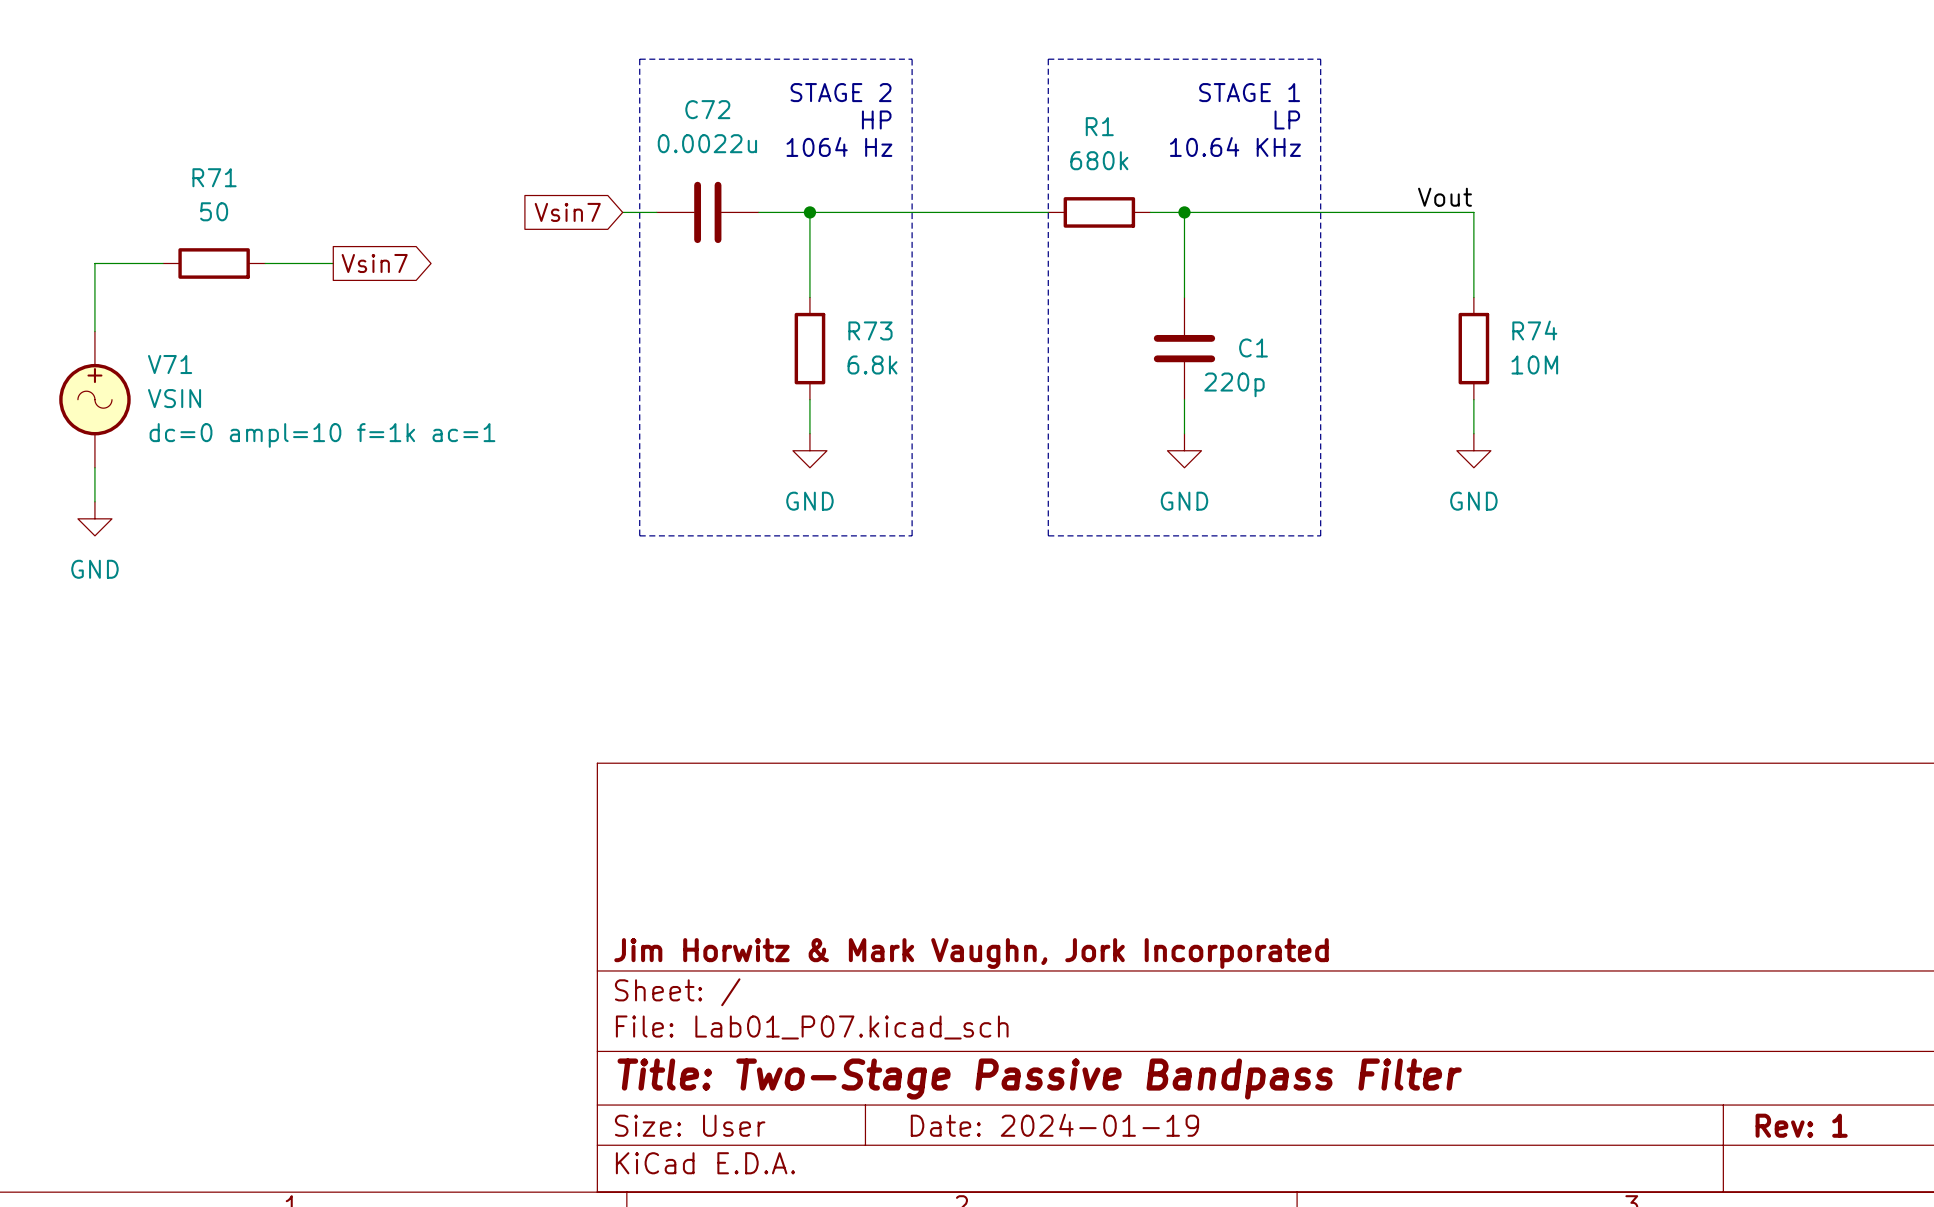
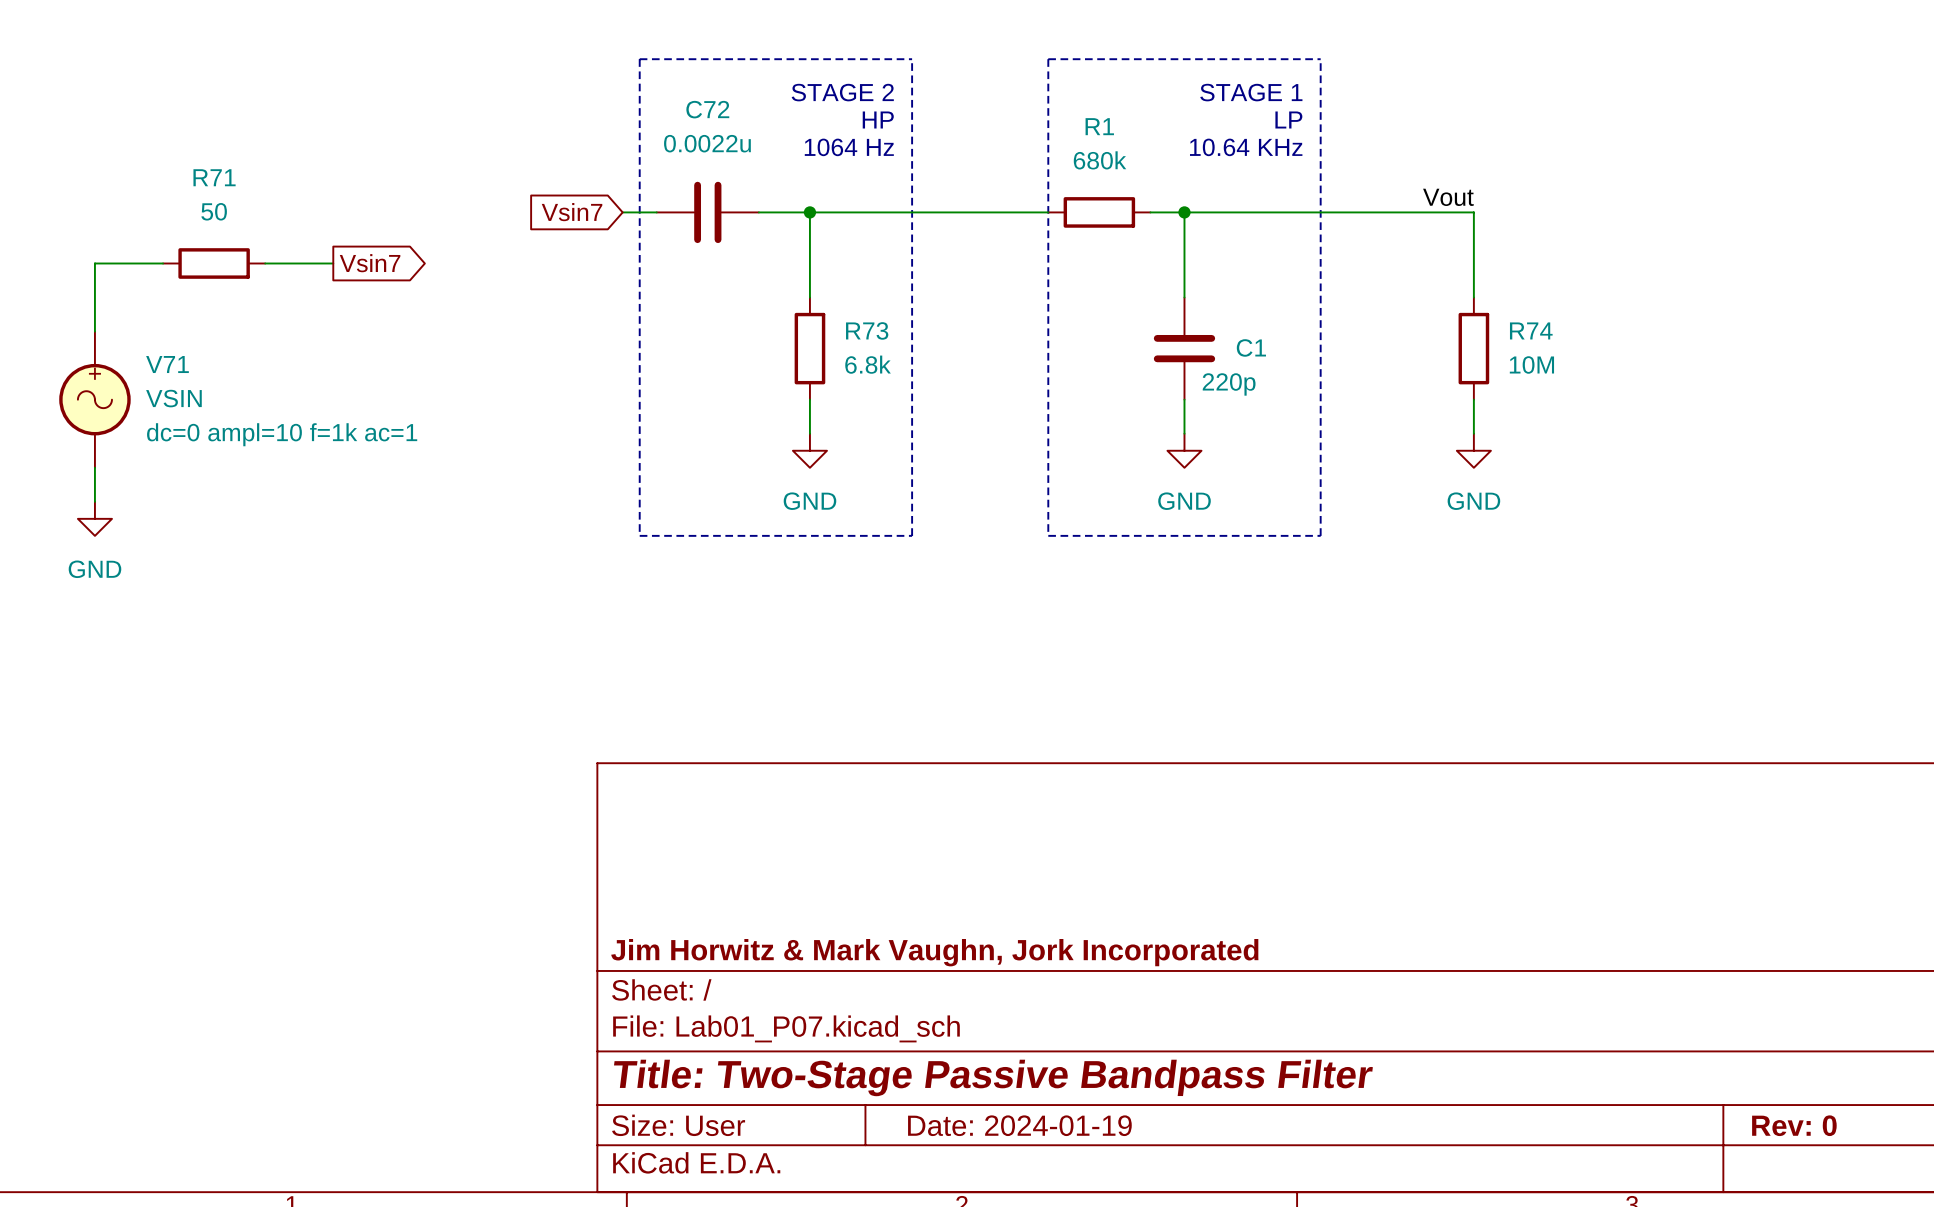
title block: Rev: 1 (1801, 1125) -> Rev: 0 (1794, 1125)

